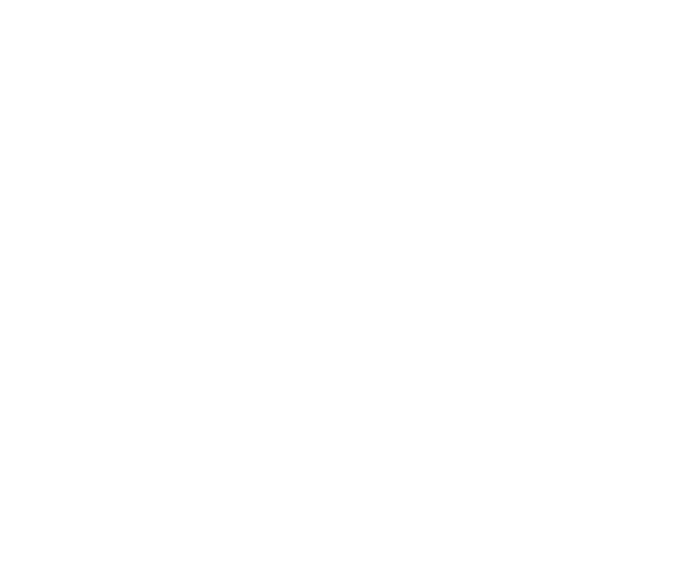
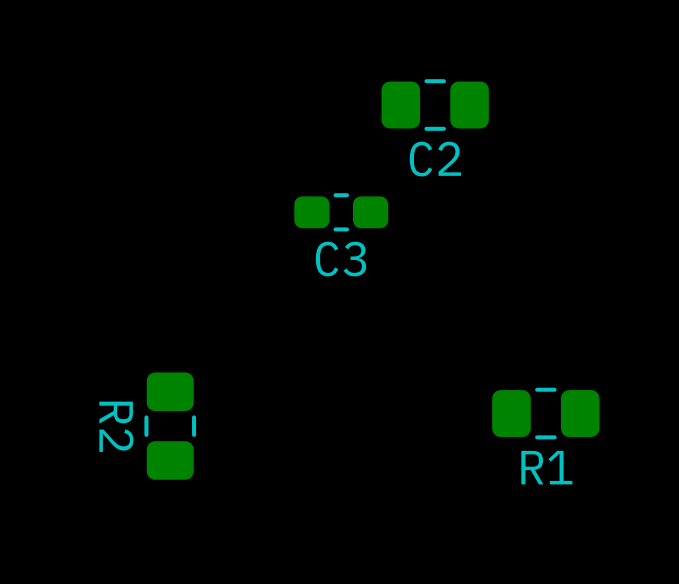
C2: none -> (435, 105)
C3: none -> (341, 212)
R1: none -> (545, 413)
R2: none -> (170, 426)

